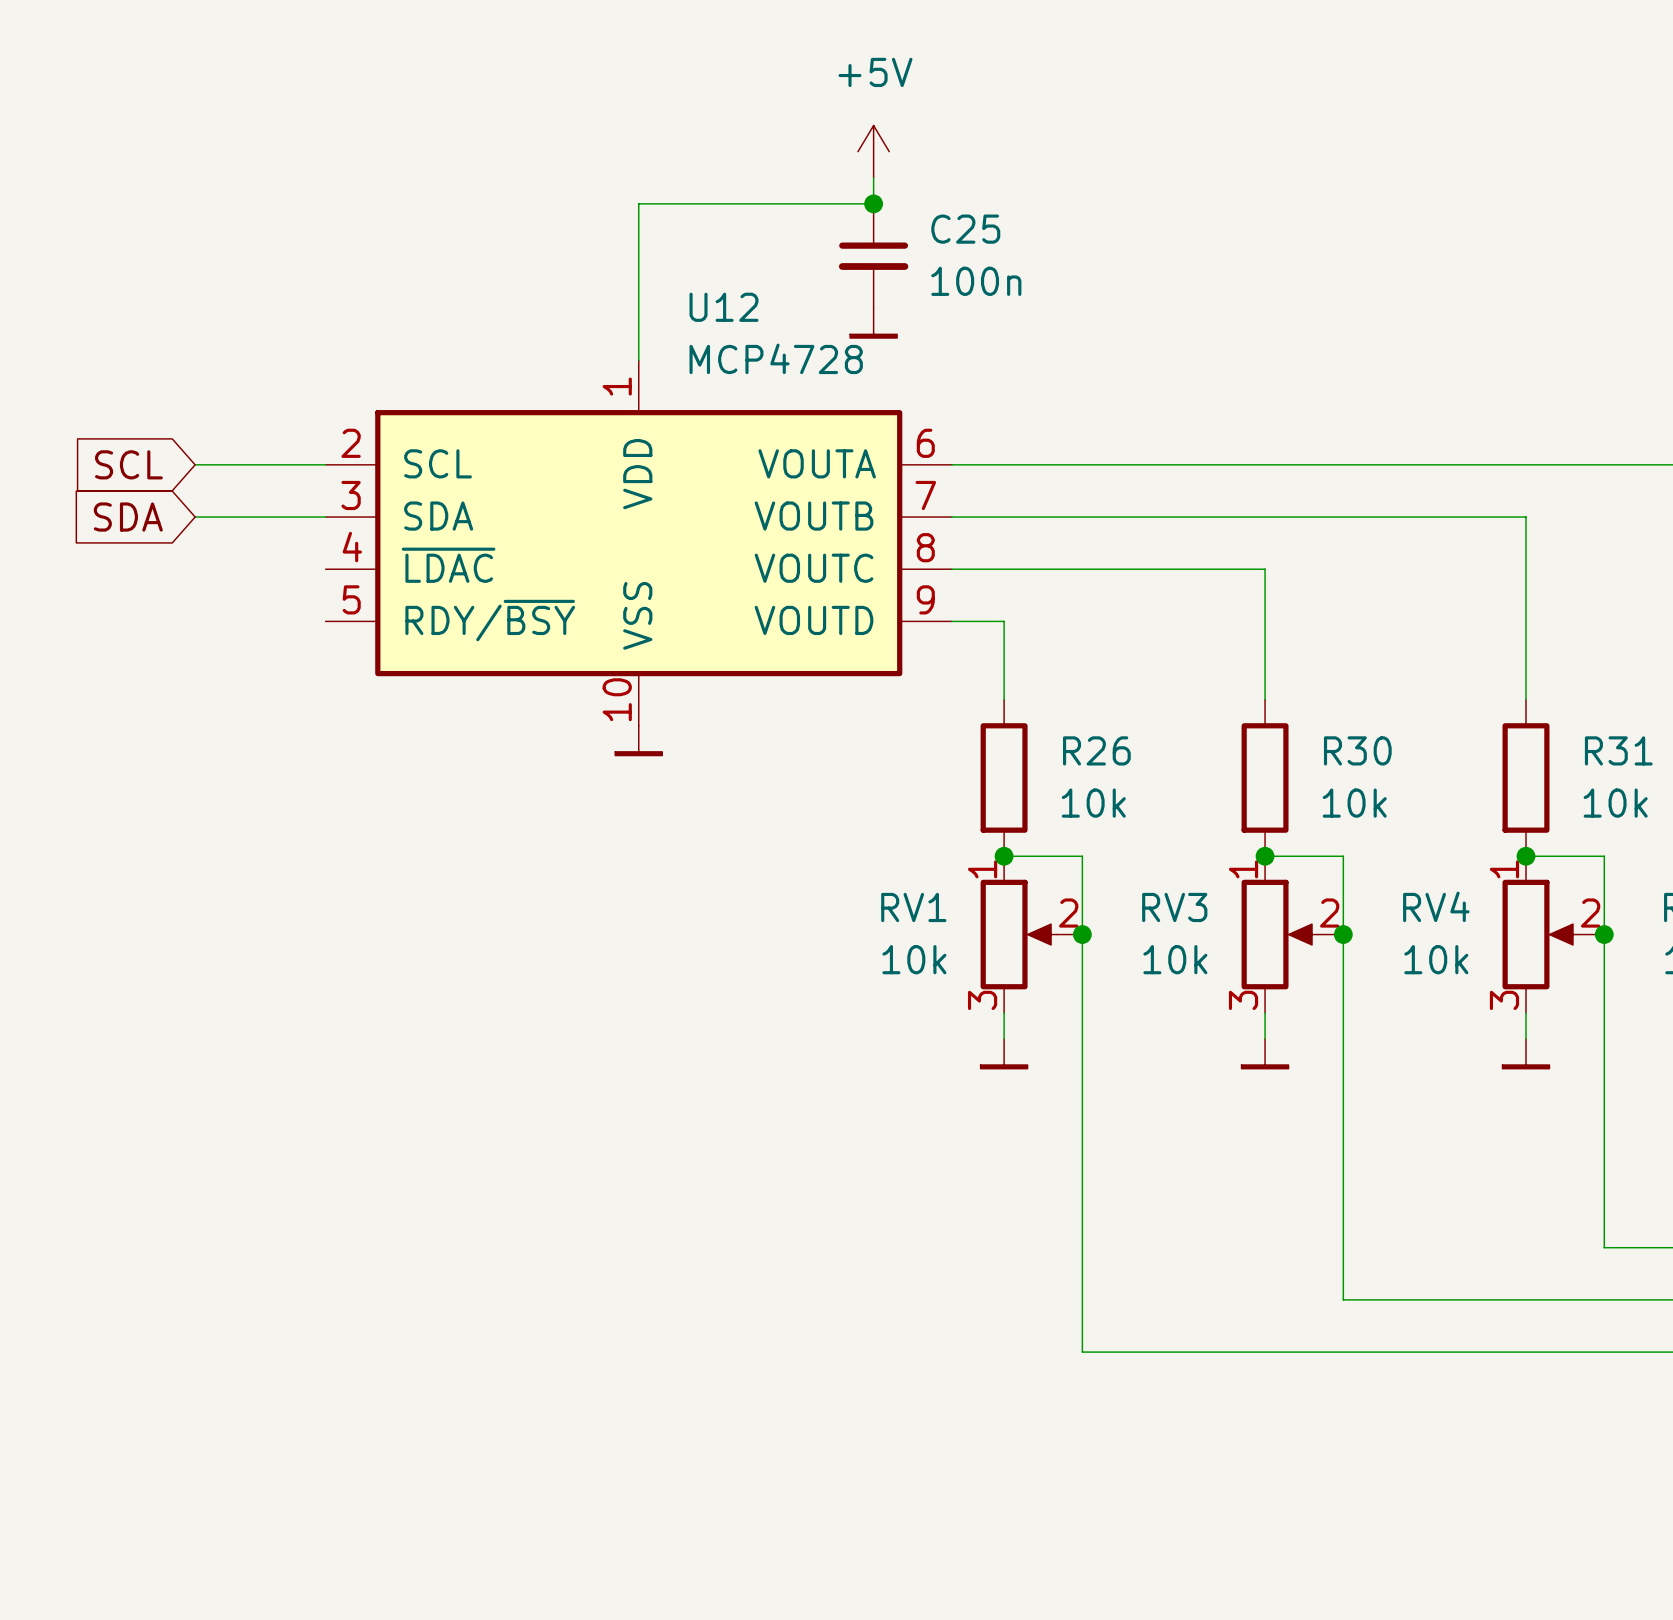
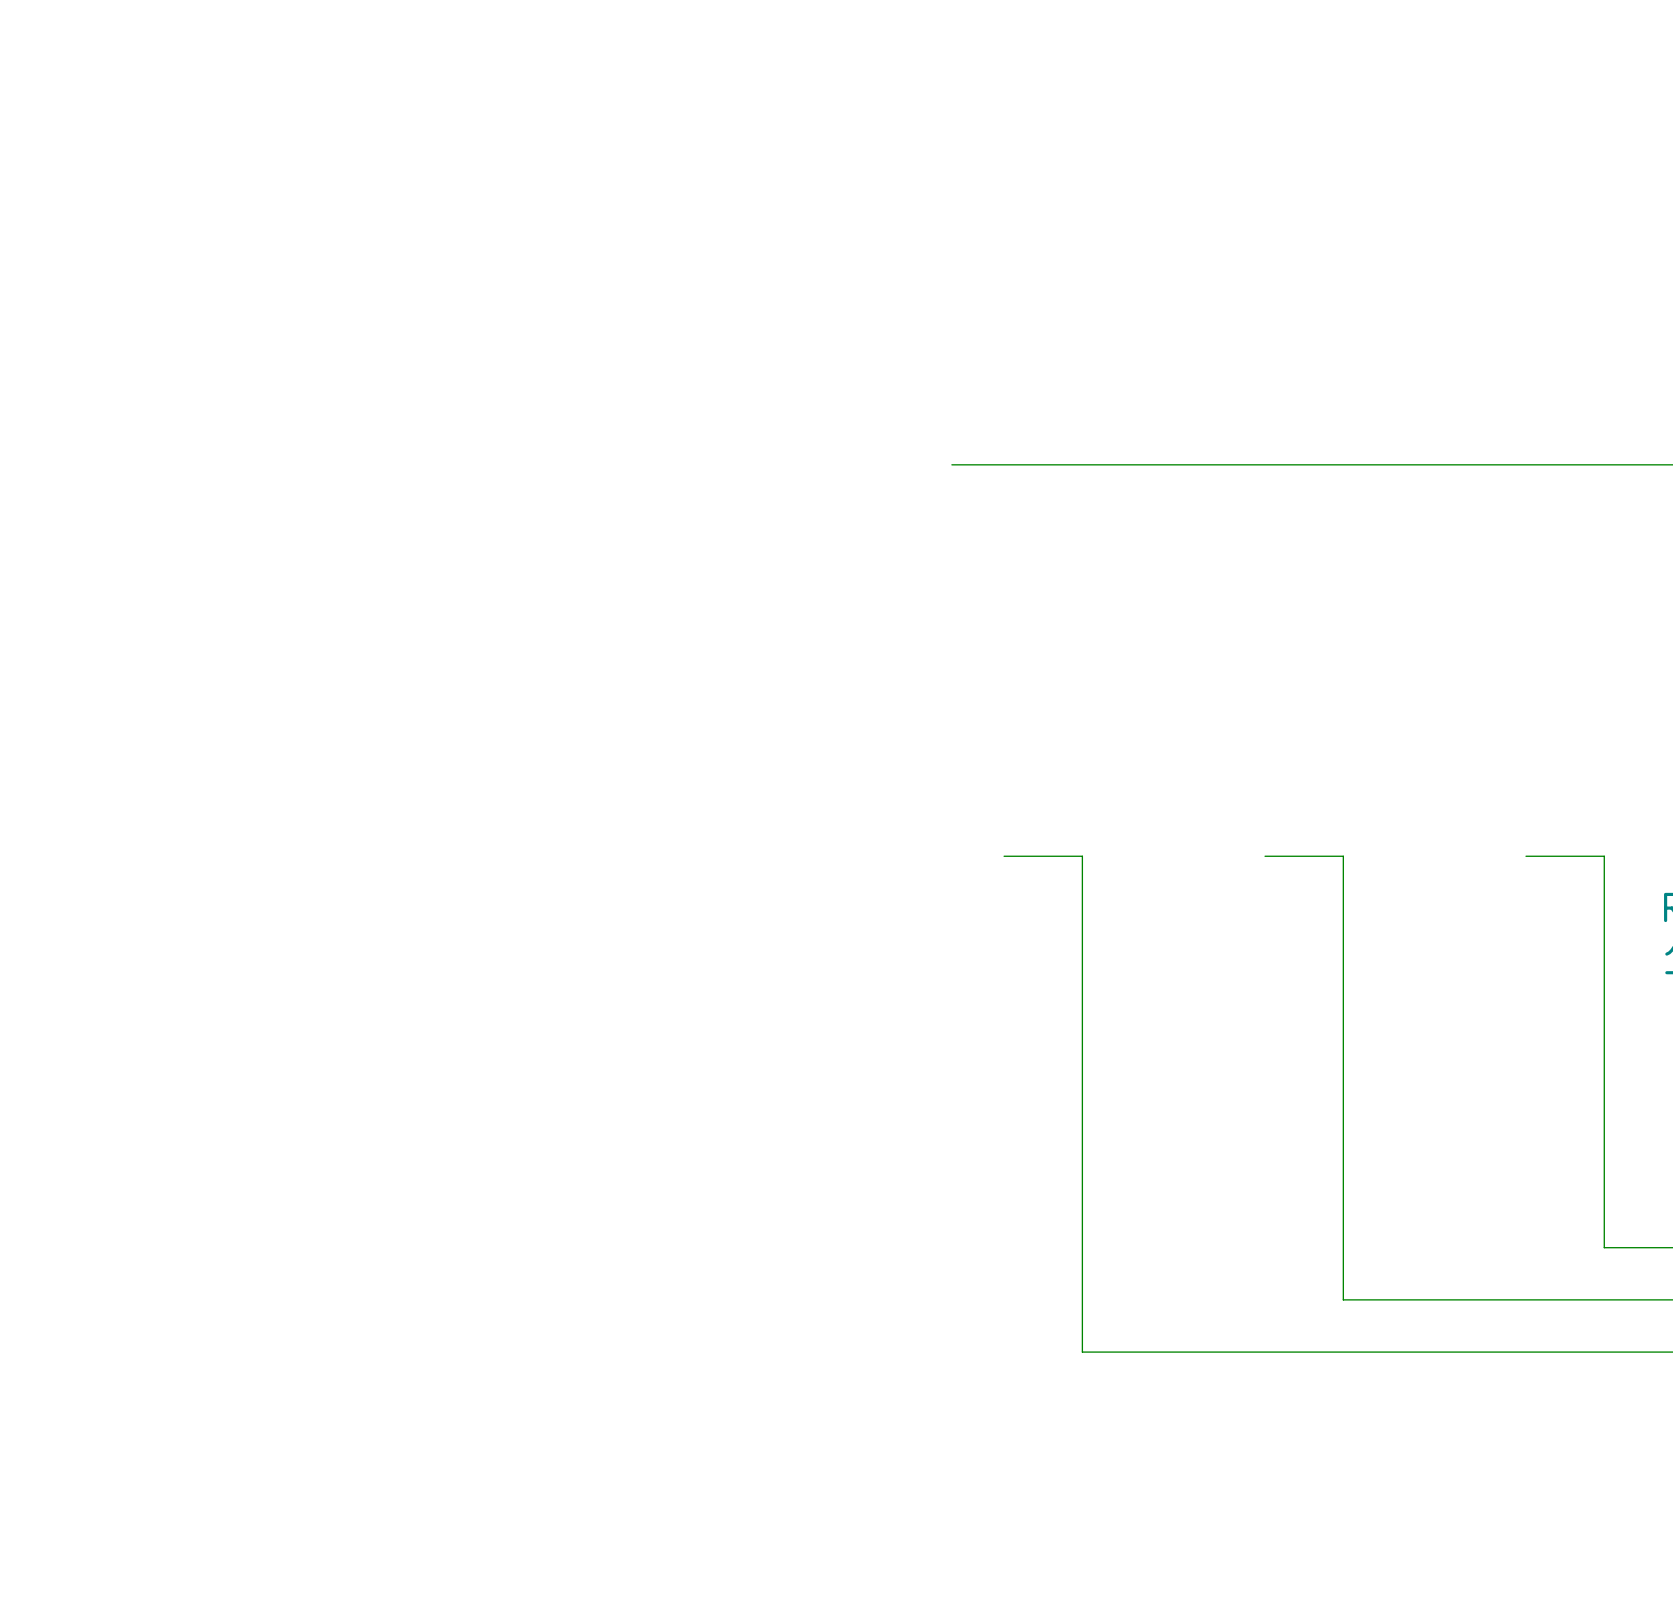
power symbol: +5V (873, 151) -> none
wire: (873, 177) (873, 203) (638, 203) (638, 360) -> none
junction: (873, 203) -> none
C25: 100n (873, 256) -> none
power symbol: (873, 323) -> none
global label: SCL (128, 464) -> none
wire: (195, 464) (325, 464) -> none
global label: SDA (128, 517) -> none
wire: (195, 517) (325, 517) -> none
wire: (951, 517) (1526, 517) (1526, 699) -> none
U12: MCP4728 (638, 543) -> none
wire: (951, 569) (1265, 569) (1265, 699) -> none
wire: (951, 621) (1004, 621) (1004, 699) -> none
power symbol: (638, 740) -> none
R26: 10k (1004, 777) -> none
R30: 10k (1265, 777) -> none
R31: 10k (1526, 777) -> none
junction: (1004, 856) -> none
junction: (1265, 856) -> none
junction: (1526, 856) -> none
RV1: 10k (1031, 934) -> none
junction: (1082, 934) -> none
RV3: 10k (1292, 934) -> none
junction: (1343, 934) -> none
RV4: 10k (1553, 934) -> none
junction: (1604, 934) -> none
wire: (1004, 1012) (1004, 1038) -> none
wire: (1265, 1012) (1265, 1038) -> none
wire: (1526, 1012) (1526, 1038) -> none
power symbol: (1004, 1053) -> none
power symbol: (1265, 1053) -> none
power symbol: (1526, 1053) -> none

